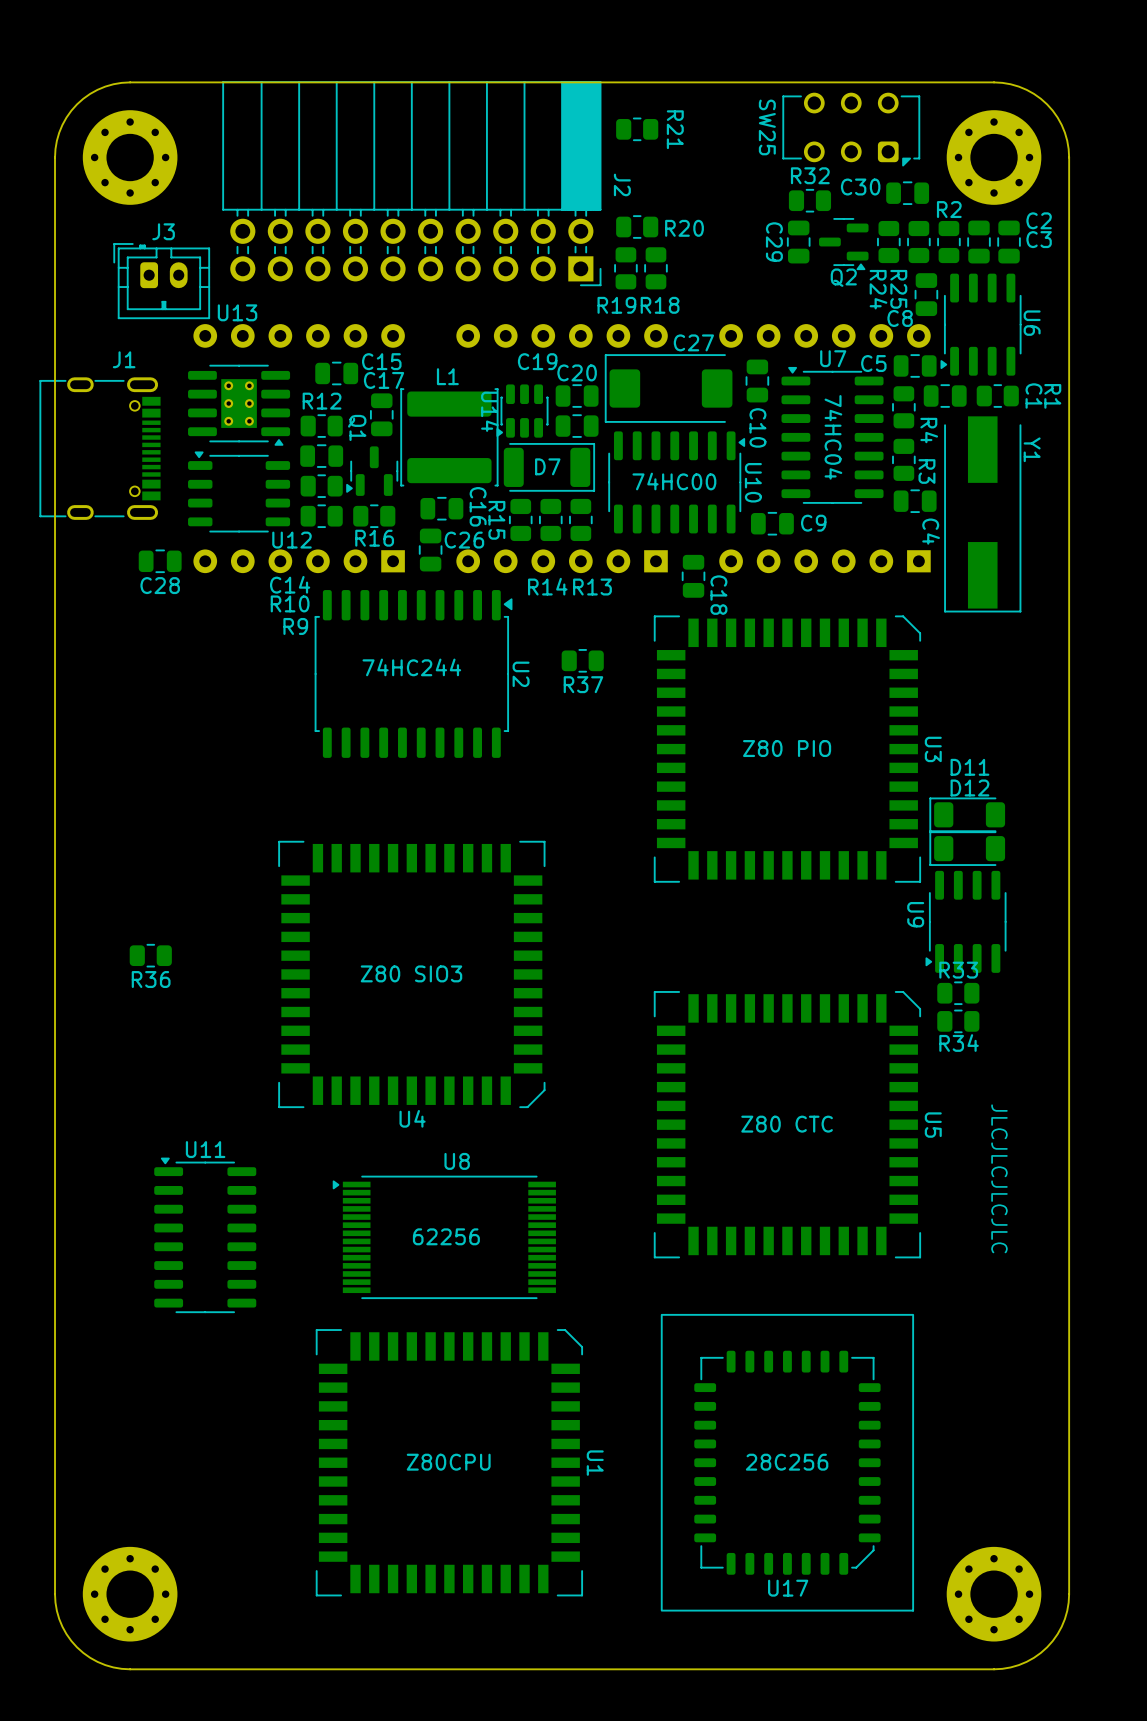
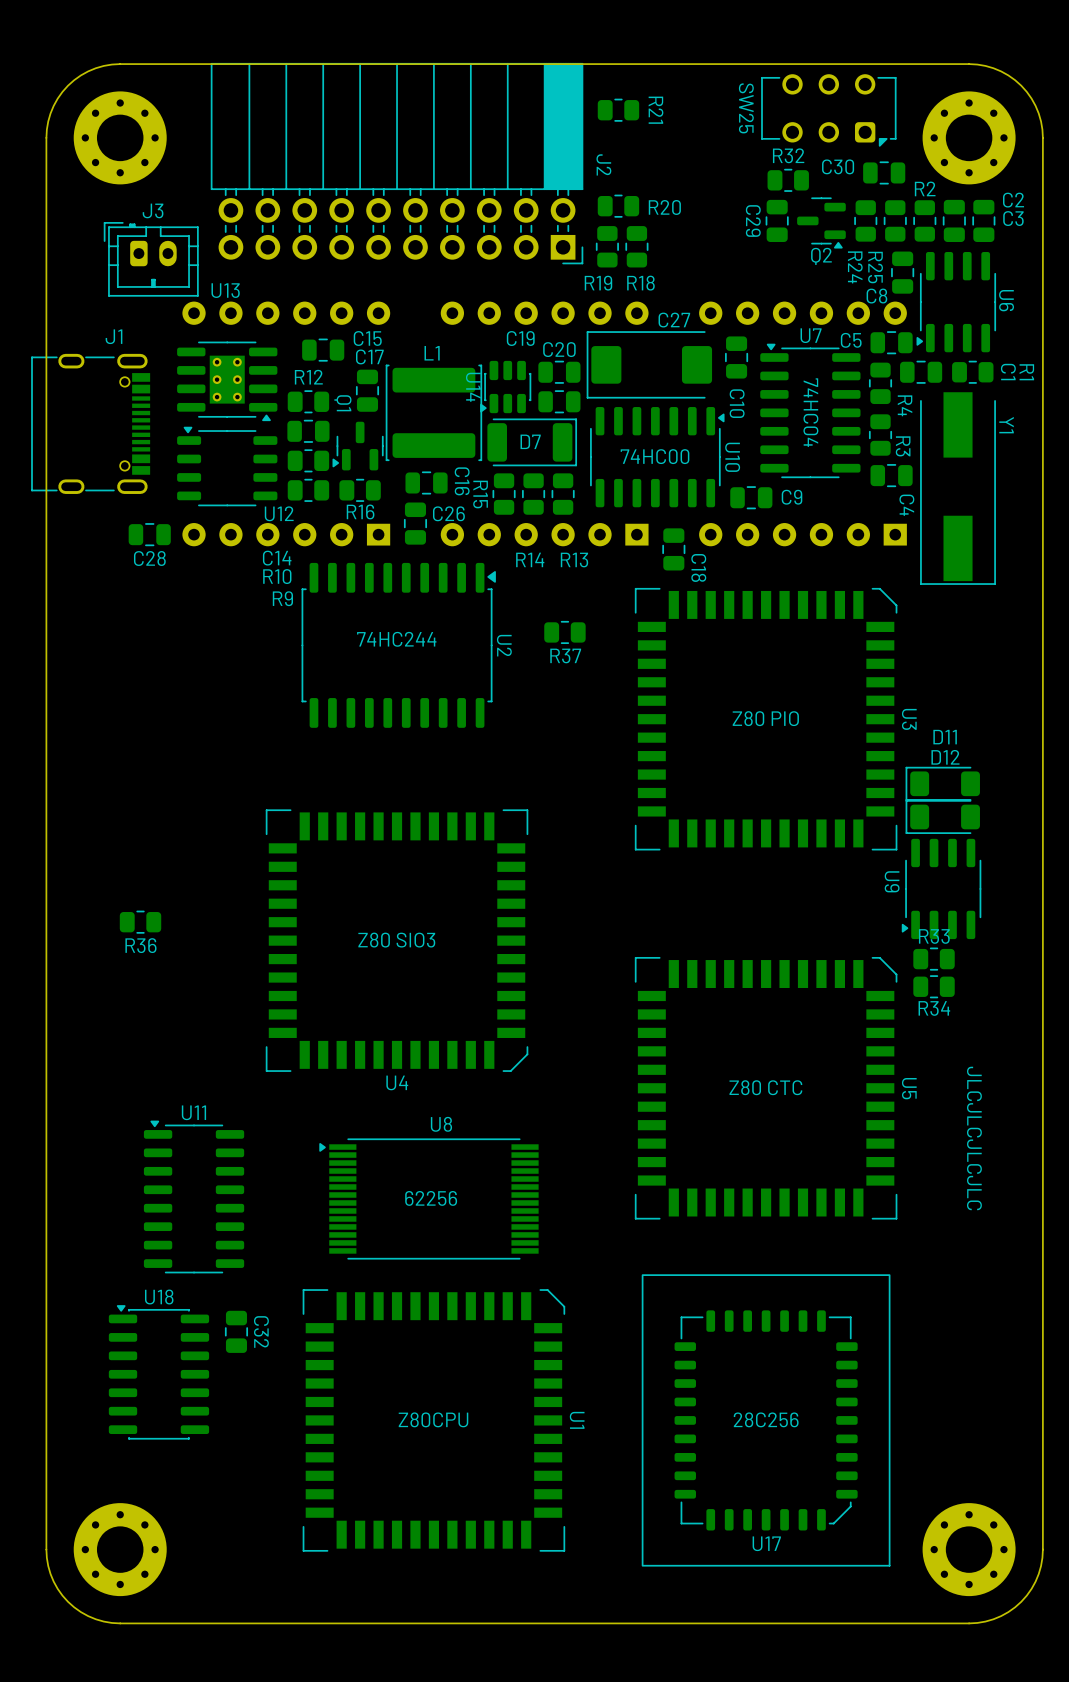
C32: none -> (236, 1331)
U18: none -> (158, 1372)

